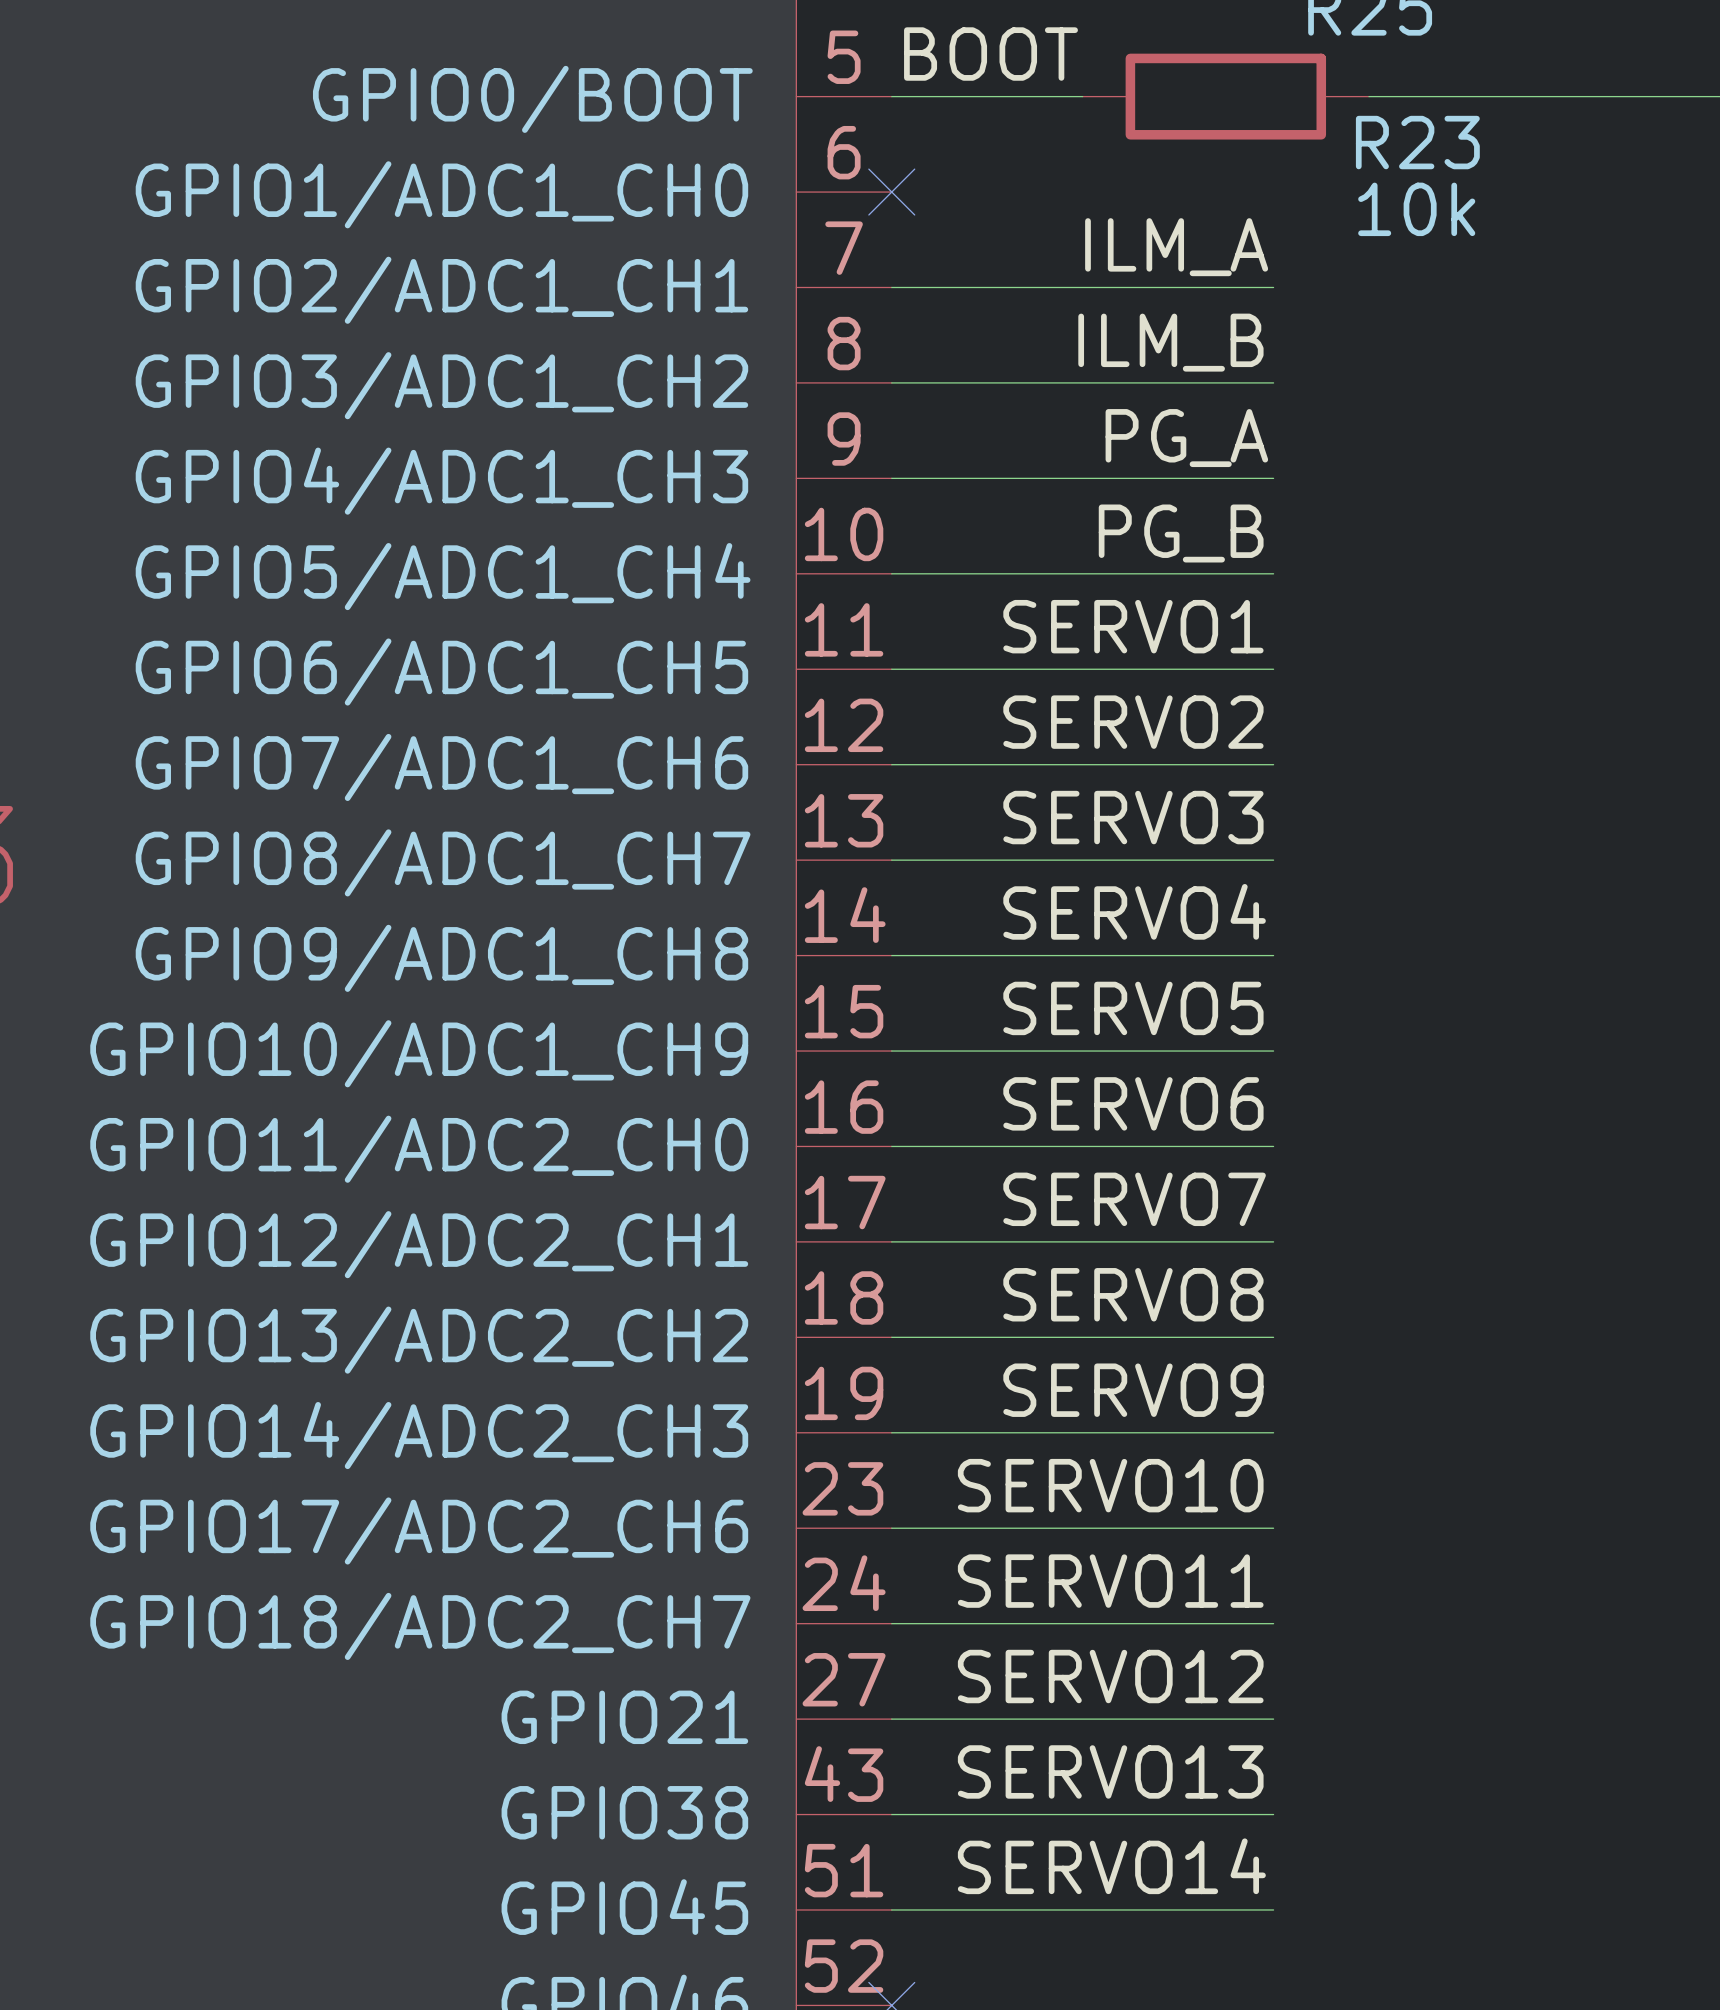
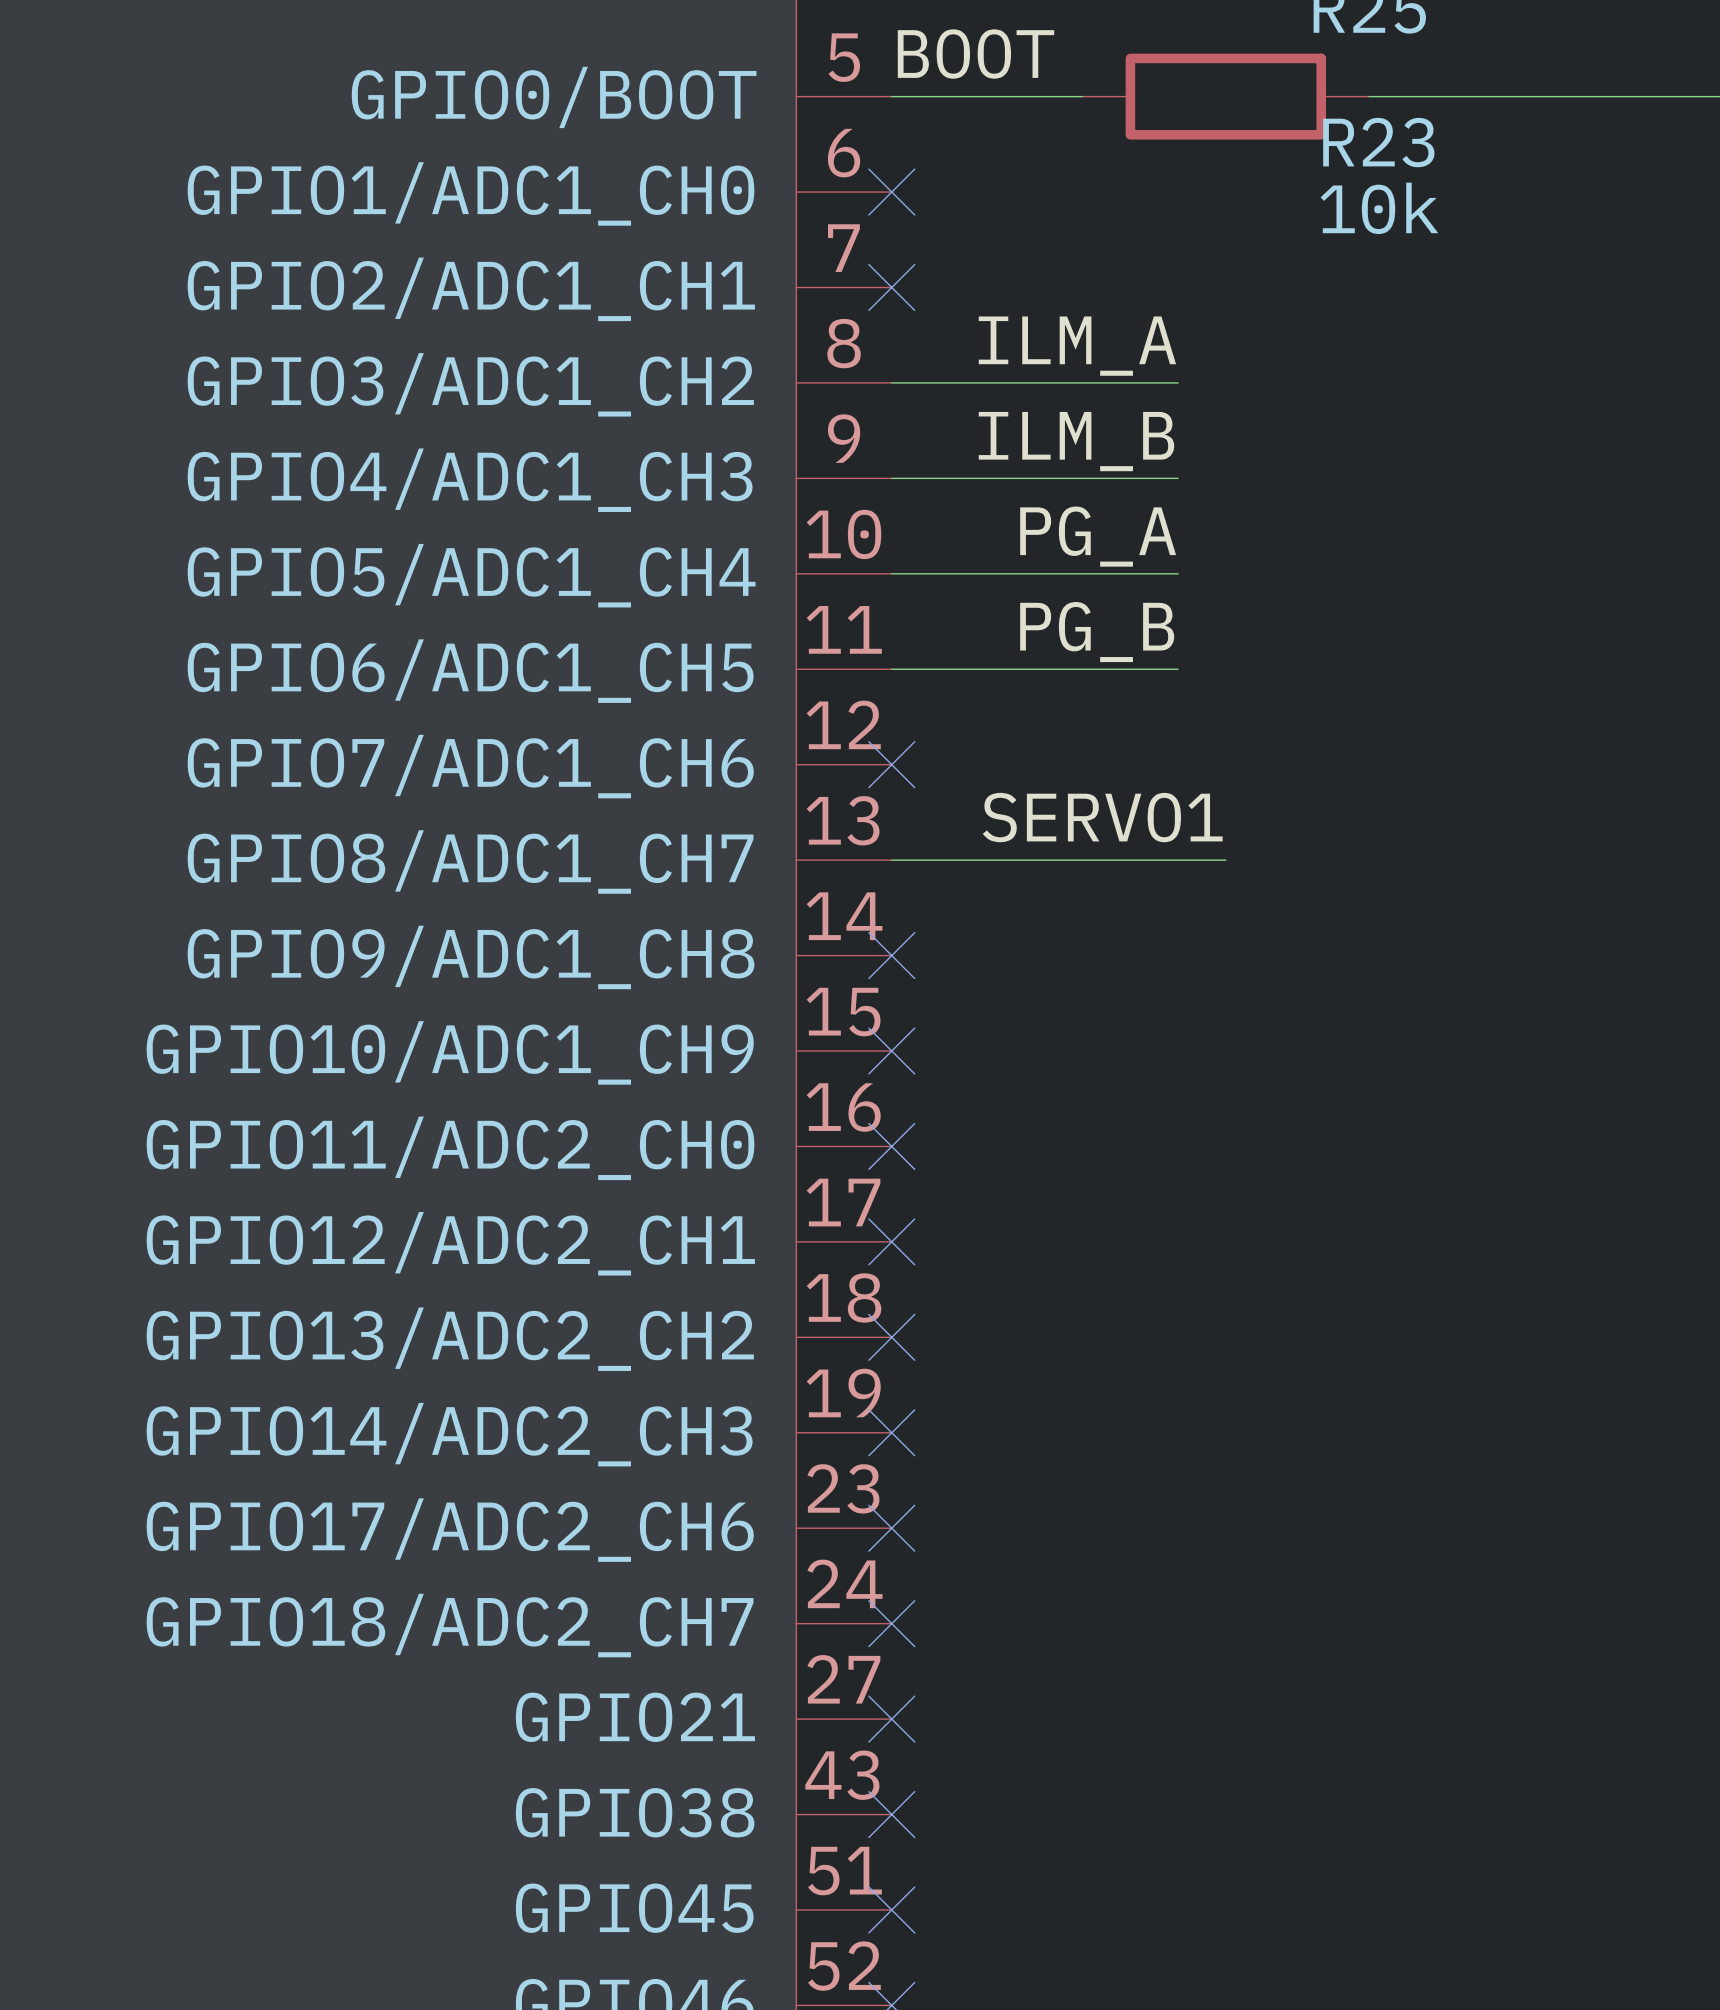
R23 name position: R23 (1417, 142) -> R23 (1378, 142)
R23 value position: 10k (1416, 209) -> 10k (1379, 208)
label position: ILM_A (1176, 247) -> ILM_A (1077, 346)
wire: (891, 287) (1273, 287) -> none
no-connect mark: none -> (891, 287)
label position: ILM_B (1170, 342) -> ILM_B (1076, 441)
wire: (1178, 382) (1273, 382) -> none
label position: PG_A (1186, 438) -> PG_A (1098, 536)
wire: (1178, 478) (1273, 478) -> none
label position: PG_B (1181, 533) -> PG_B (1097, 632)
wire: (1178, 573) (1273, 573) -> none
label position: SERVO1 (1133, 626) -> SERVO1 (1102, 817)
wire: (1178, 669) (1273, 669) -> none
label: SERVO2 (1133, 722) -> none
wire: (891, 764) (1273, 764) -> none
no-connect mark: none -> (891, 764)
label: SERVO3 (1133, 817) -> none
wire: (1225, 860) (1273, 860) -> none
label: SERVO4 (1134, 911) -> none
wire: (891, 955) (1273, 955) -> none
no-connect mark: none -> (891, 955)
label: SERVO5 (1133, 1008) -> none
wire: (891, 1051) (1273, 1051) -> none
no-connect mark: none -> (891, 1051)
label: SERVO6 (1133, 1103) -> none
wire: (891, 1146) (1273, 1146) -> none
no-connect mark: none -> (891, 1146)
label: SERVO7 (1134, 1199) -> none
wire: (891, 1241) (1273, 1241) -> none
no-connect mark: none -> (891, 1241)
label: SERVO8 (1133, 1294) -> none
wire: (891, 1337) (1273, 1337) -> none
no-connect mark: none -> (891, 1337)
label: SERVO9 (1133, 1390) -> none
wire: (891, 1432) (1273, 1432) -> none
no-connect mark: none -> (891, 1432)
label: SERVO10 (1110, 1485) -> none
wire: (891, 1528) (1273, 1528) -> none
no-connect mark: none -> (891, 1528)
label: SERVO11 (1110, 1581) -> none
wire: (891, 1623) (1273, 1623) -> none
no-connect mark: none -> (891, 1623)
label: SERVO12 (1110, 1676) -> none
wire: (891, 1719) (1273, 1719) -> none
no-connect mark: none -> (891, 1719)
label: SERVO13 (1110, 1771) -> none
wire: (891, 1814) (1273, 1814) -> none
no-connect mark: none -> (891, 1814)
label: SERVO14 (1111, 1866) -> none
wire: (891, 1909) (1273, 1909) -> none
no-connect mark: none -> (891, 1909)

